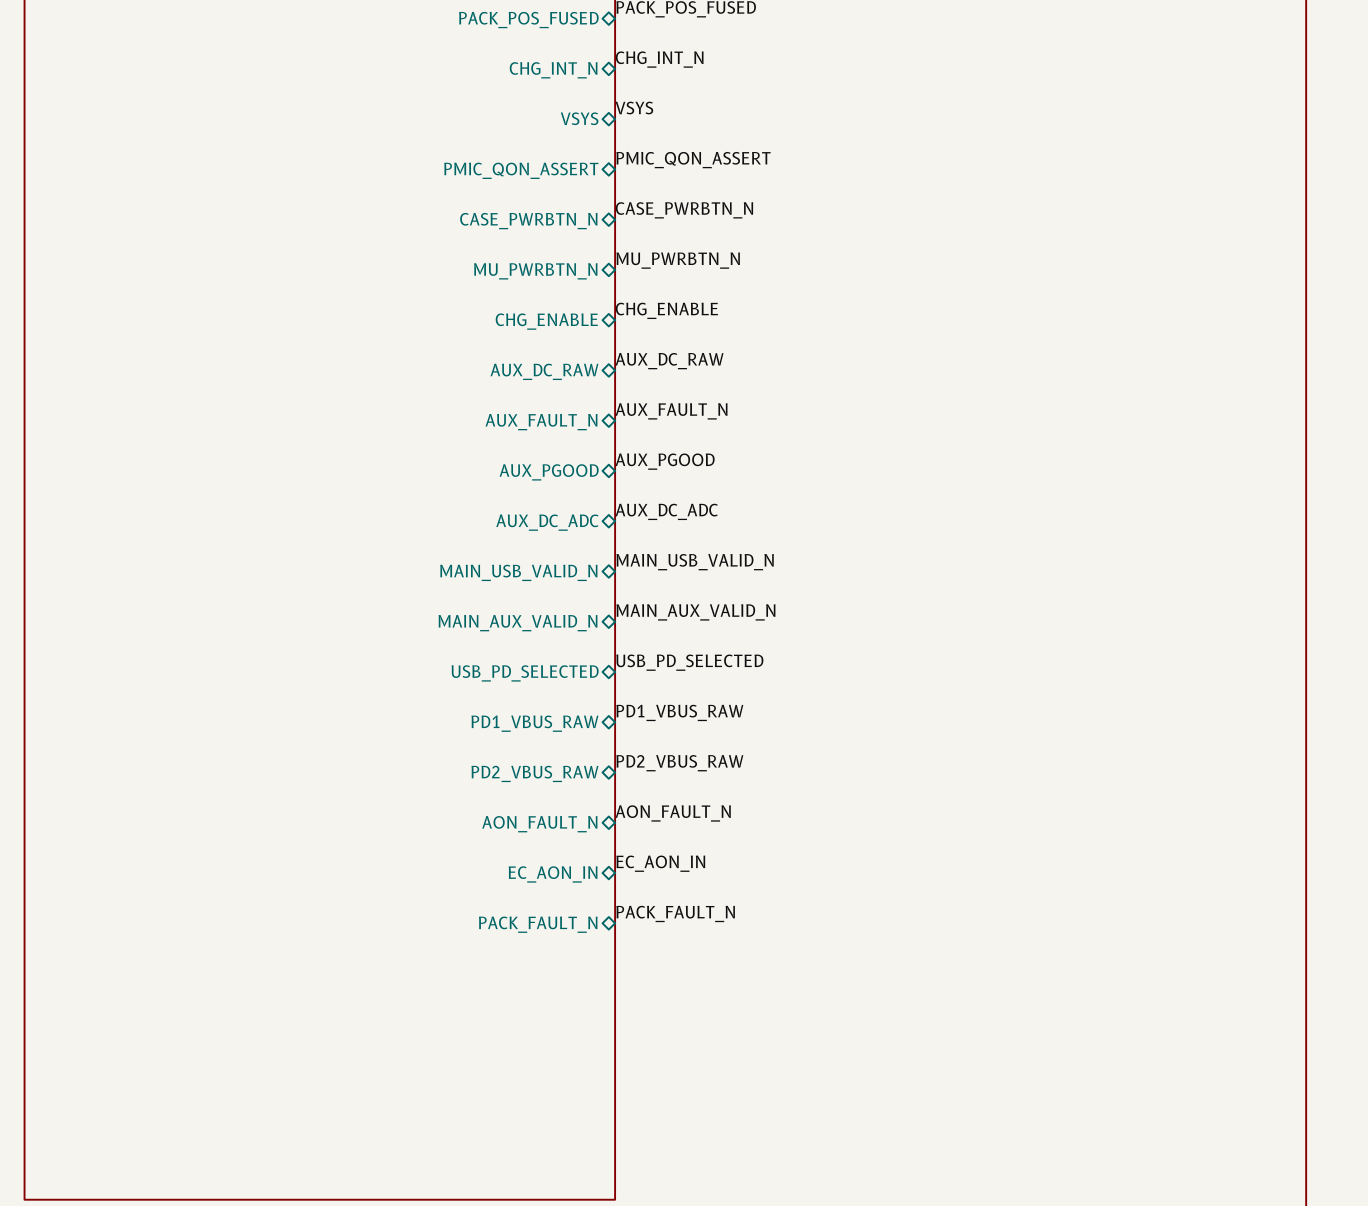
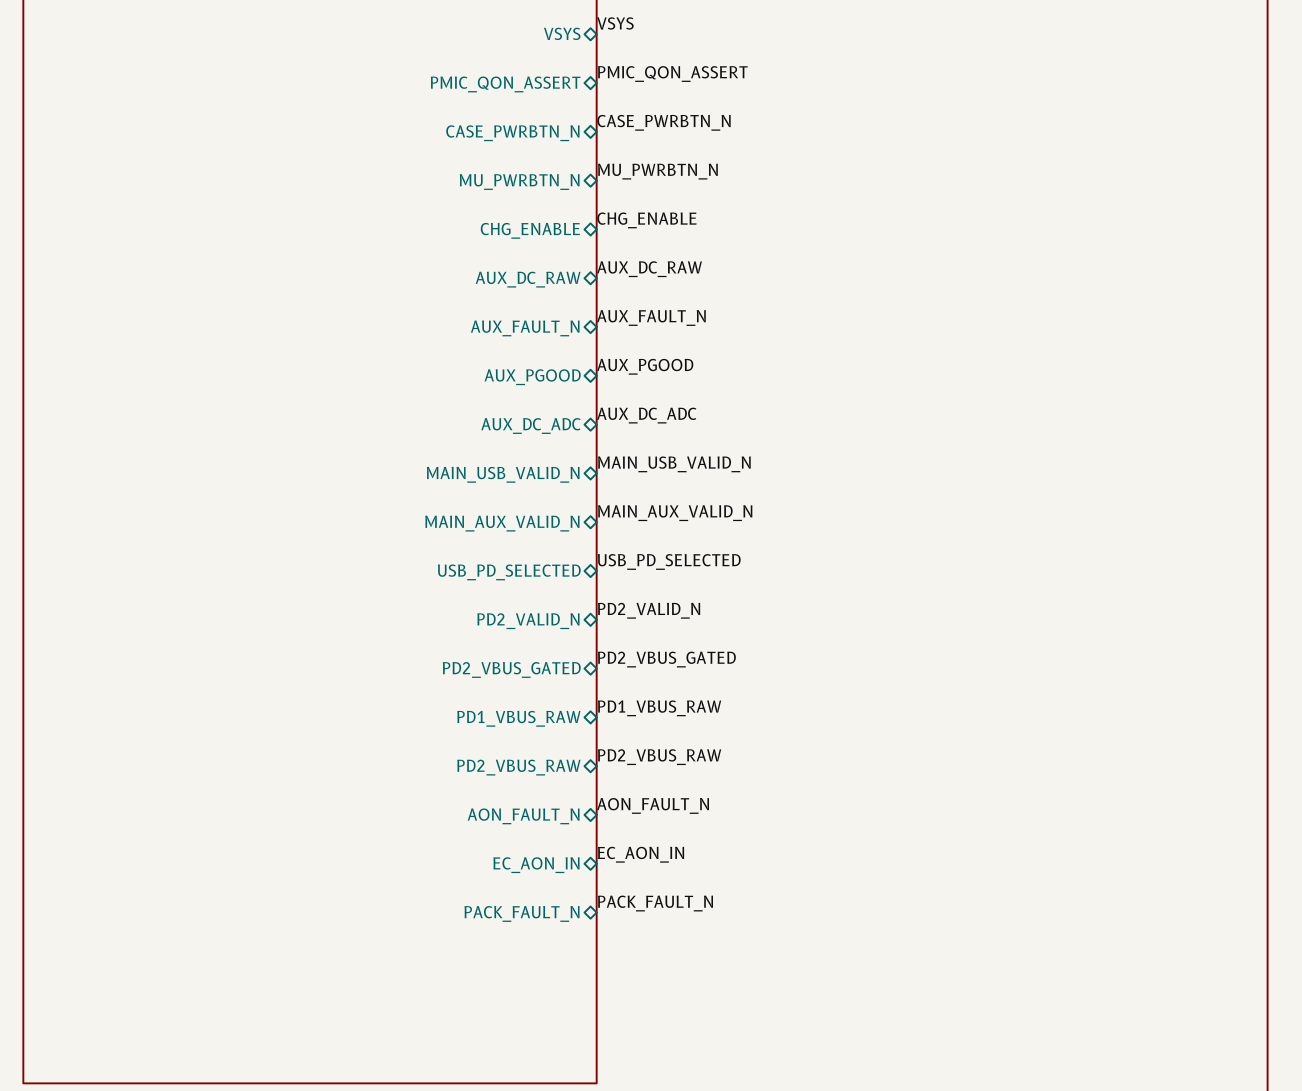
label: PD1_VBUS_RAW (679, 712) -> PD2_VALID_N (649, 610)
sheet pin: PD1_VBUS_RAW (534, 723) -> PD2_VALID_N (528, 621)
label: PD2_VBUS_RAW (679, 763) -> PD2_VBUS_GATED (666, 659)
sheet pin: PD2_VBUS_RAW (534, 773) -> PD2_VBUS_GATED (511, 669)
label: AON_FAULT_N (673, 813) -> PD1_VBUS_RAW (659, 708)
sheet pin: AON_FAULT_N (539, 824) -> PD1_VBUS_RAW (518, 718)
label: EC_AON_IN (660, 863) -> PD2_VBUS_RAW (659, 757)
sheet pin: EC_AON_IN (553, 874) -> PD2_VBUS_RAW (518, 767)
label: PACK_FAULT_N (675, 913) -> AON_FAULT_N (653, 805)
sheet pin: PACK_FAULT_N (538, 924) -> AON_FAULT_N (523, 816)
label: none -> EC_AON_IN (641, 854)
sheet pin: none -> EC_AON_IN (536, 865)
label: none -> PACK_FAULT_N (655, 903)
sheet pin: none -> PACK_FAULT_N (521, 913)

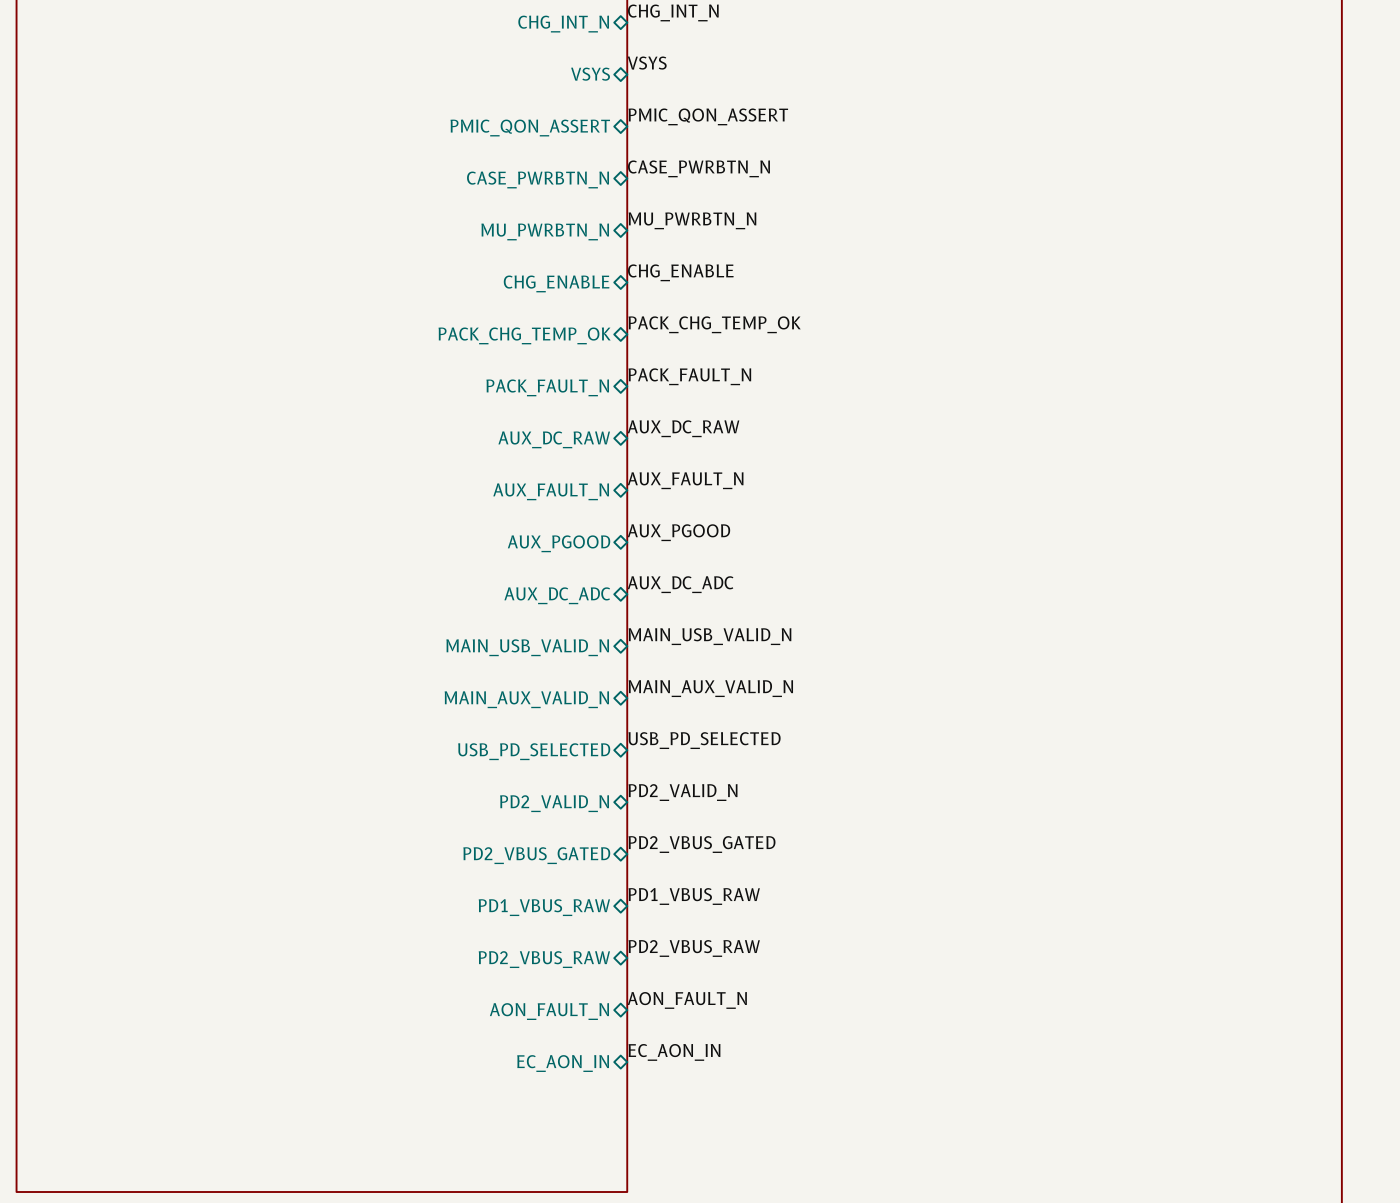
label: AUX_DC_RAW (649, 269) -> PACK_CHG_TEMP_OK (714, 324)
sheet pin: AUX_DC_RAW (528, 279) -> PACK_CHG_TEMP_OK (524, 335)
label: AUX_FAULT_N (651, 317) -> PACK_FAULT_N (689, 376)
sheet pin: AUX_FAULT_N (525, 328) -> PACK_FAULT_N (547, 387)
label: AUX_PGOOD (645, 366) -> AUX_DC_RAW (683, 428)
sheet pin: AUX_PGOOD (532, 377) -> AUX_DC_RAW (554, 439)
label: AUX_DC_ADC (646, 415) -> AUX_FAULT_N (685, 480)
sheet pin: AUX_DC_ADC (530, 426) -> AUX_FAULT_N (551, 491)
label: MAIN_USB_VALID_N (674, 464) -> AUX_PGOOD (678, 532)
sheet pin: MAIN_USB_VALID_N (503, 474) -> AUX_PGOOD (559, 543)
label: MAIN_AUX_VALID_N (675, 513) -> AUX_DC_ADC (680, 584)
sheet pin: MAIN_AUX_VALID_N (502, 523) -> AUX_DC_ADC (557, 595)
label: USB_PD_SELECTED (669, 561) -> MAIN_USB_VALID_N (710, 636)
sheet pin: USB_PD_SELECTED (509, 572) -> MAIN_USB_VALID_N (527, 647)
label: PD2_VALID_N (649, 610) -> MAIN_AUX_VALID_N (710, 688)
sheet pin: PD2_VALID_N (528, 621) -> MAIN_AUX_VALID_N (526, 699)
label: PD2_VBUS_GATED (666, 659) -> USB_PD_SELECTED (704, 740)
sheet pin: PD2_VBUS_GATED (511, 669) -> USB_PD_SELECTED (534, 751)
label: PD1_VBUS_RAW (659, 708) -> PD2_VALID_N (683, 792)
sheet pin: PD1_VBUS_RAW (518, 718) -> PD2_VALID_N (554, 803)
label: PD2_VBUS_RAW (659, 757) -> PD2_VBUS_GATED (702, 844)
sheet pin: PD2_VBUS_RAW (518, 767) -> PD2_VBUS_GATED (536, 855)
label: AON_FAULT_N (653, 805) -> PD1_VBUS_RAW (694, 896)
sheet pin: AON_FAULT_N (523, 816) -> PD1_VBUS_RAW (544, 907)
label: EC_AON_IN (641, 854) -> PD2_VBUS_RAW (694, 948)
sheet pin: EC_AON_IN (536, 865) -> PD2_VBUS_RAW (544, 959)
label: PACK_FAULT_N (655, 903) -> AON_FAULT_N (687, 1000)
sheet pin: PACK_FAULT_N (521, 913) -> AON_FAULT_N (549, 1011)
label: none -> EC_AON_IN (674, 1052)
sheet pin: none -> EC_AON_IN (563, 1063)

